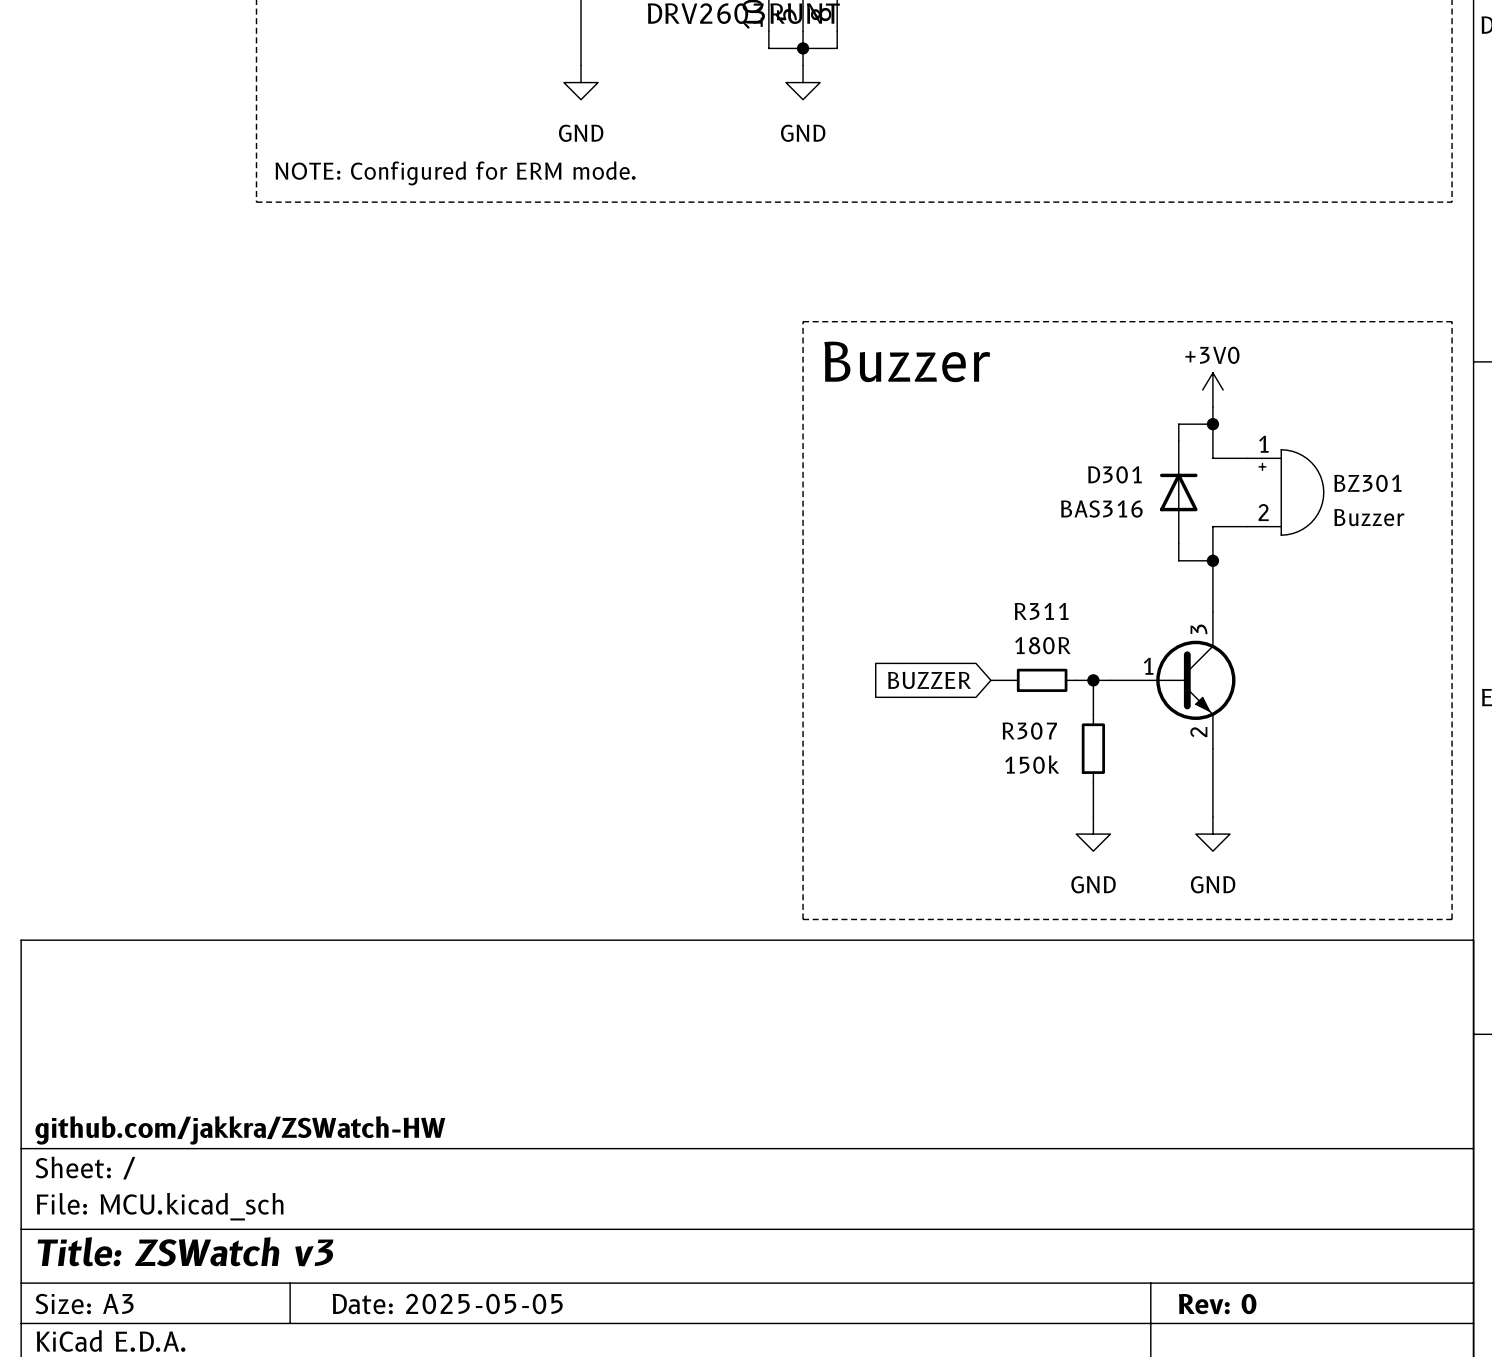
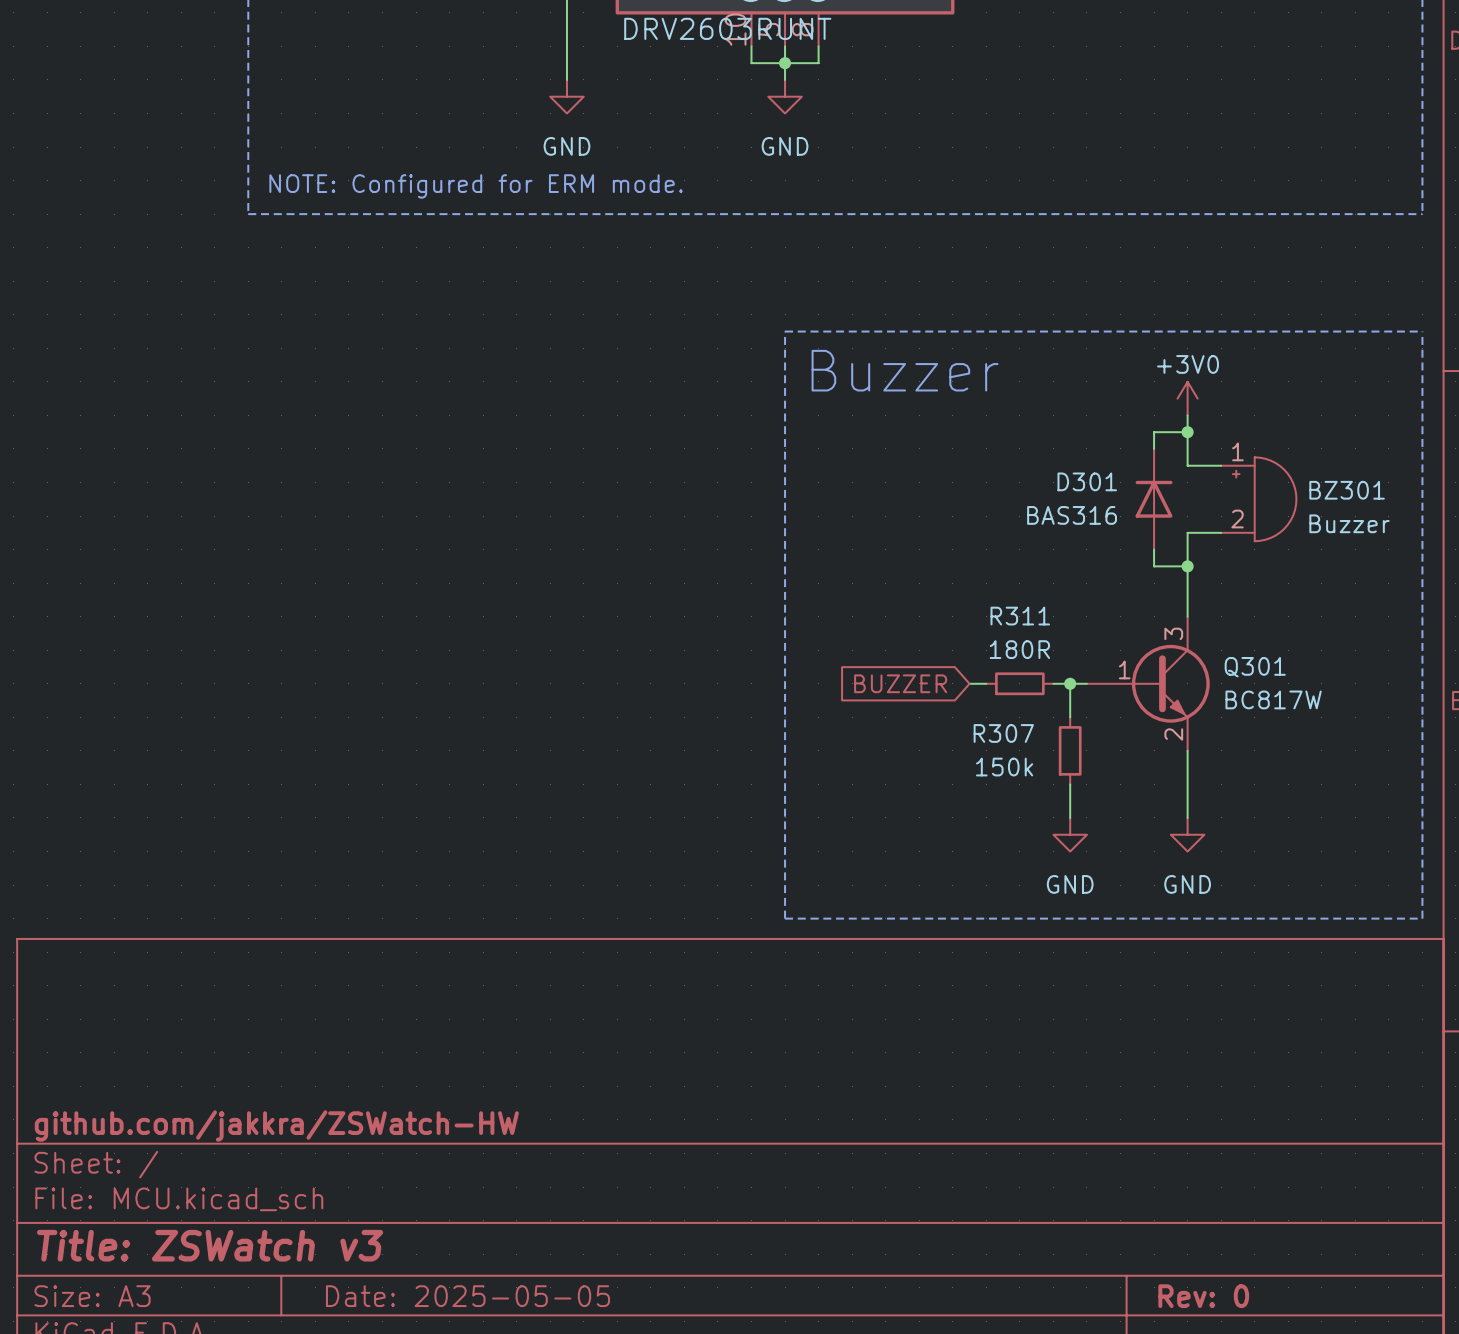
Q301 name: none -> Q301 (1255, 667)
Q301 value: none -> BC817W (1273, 699)

